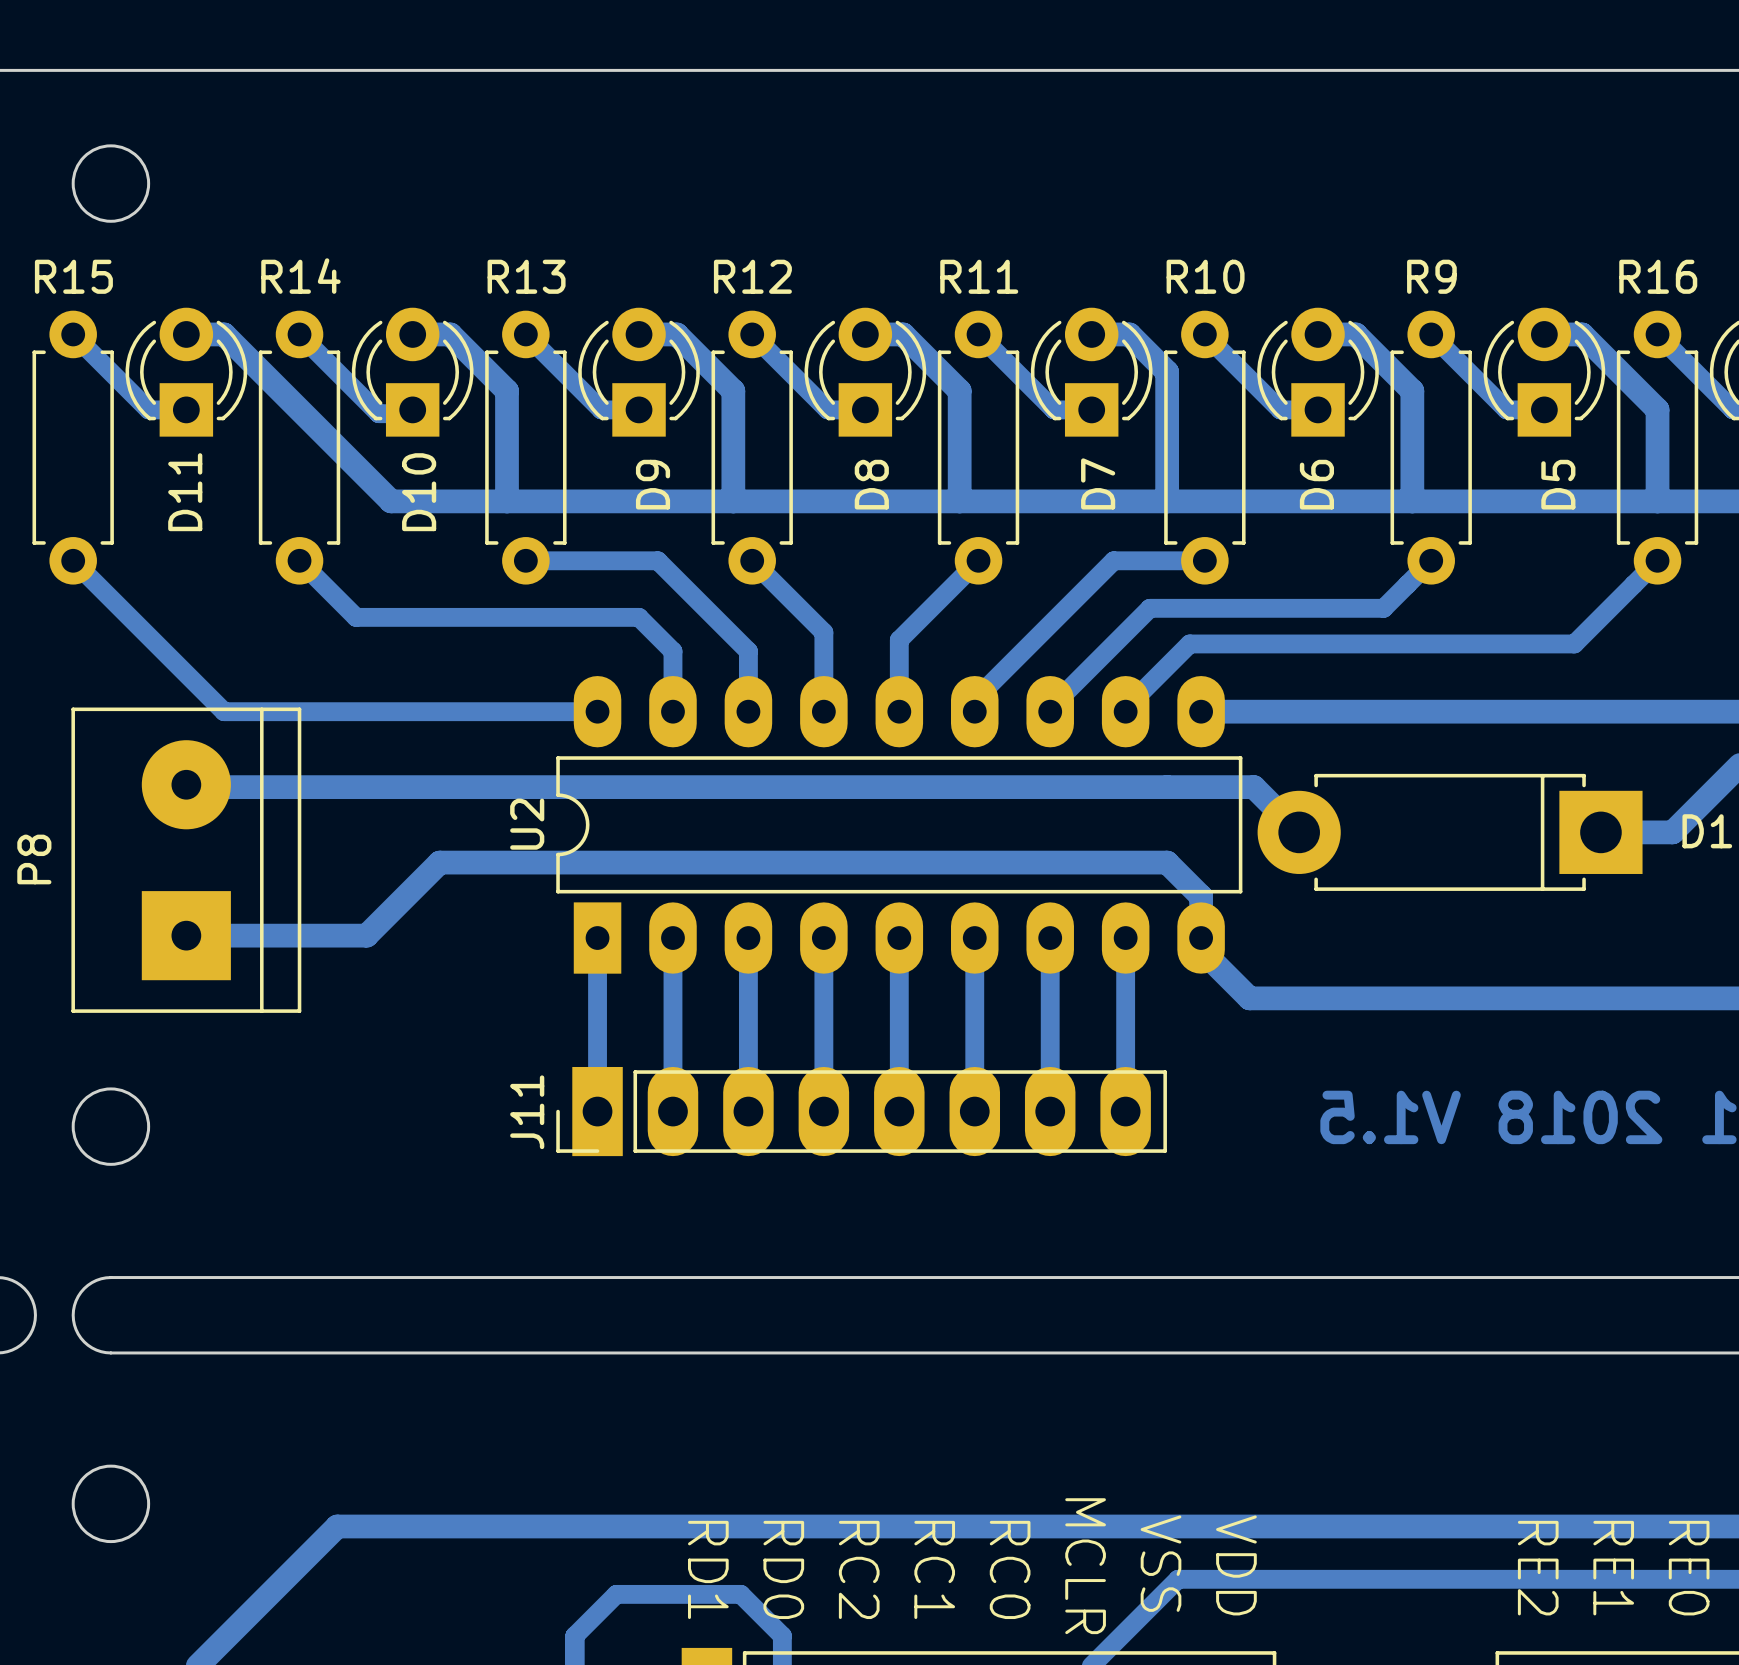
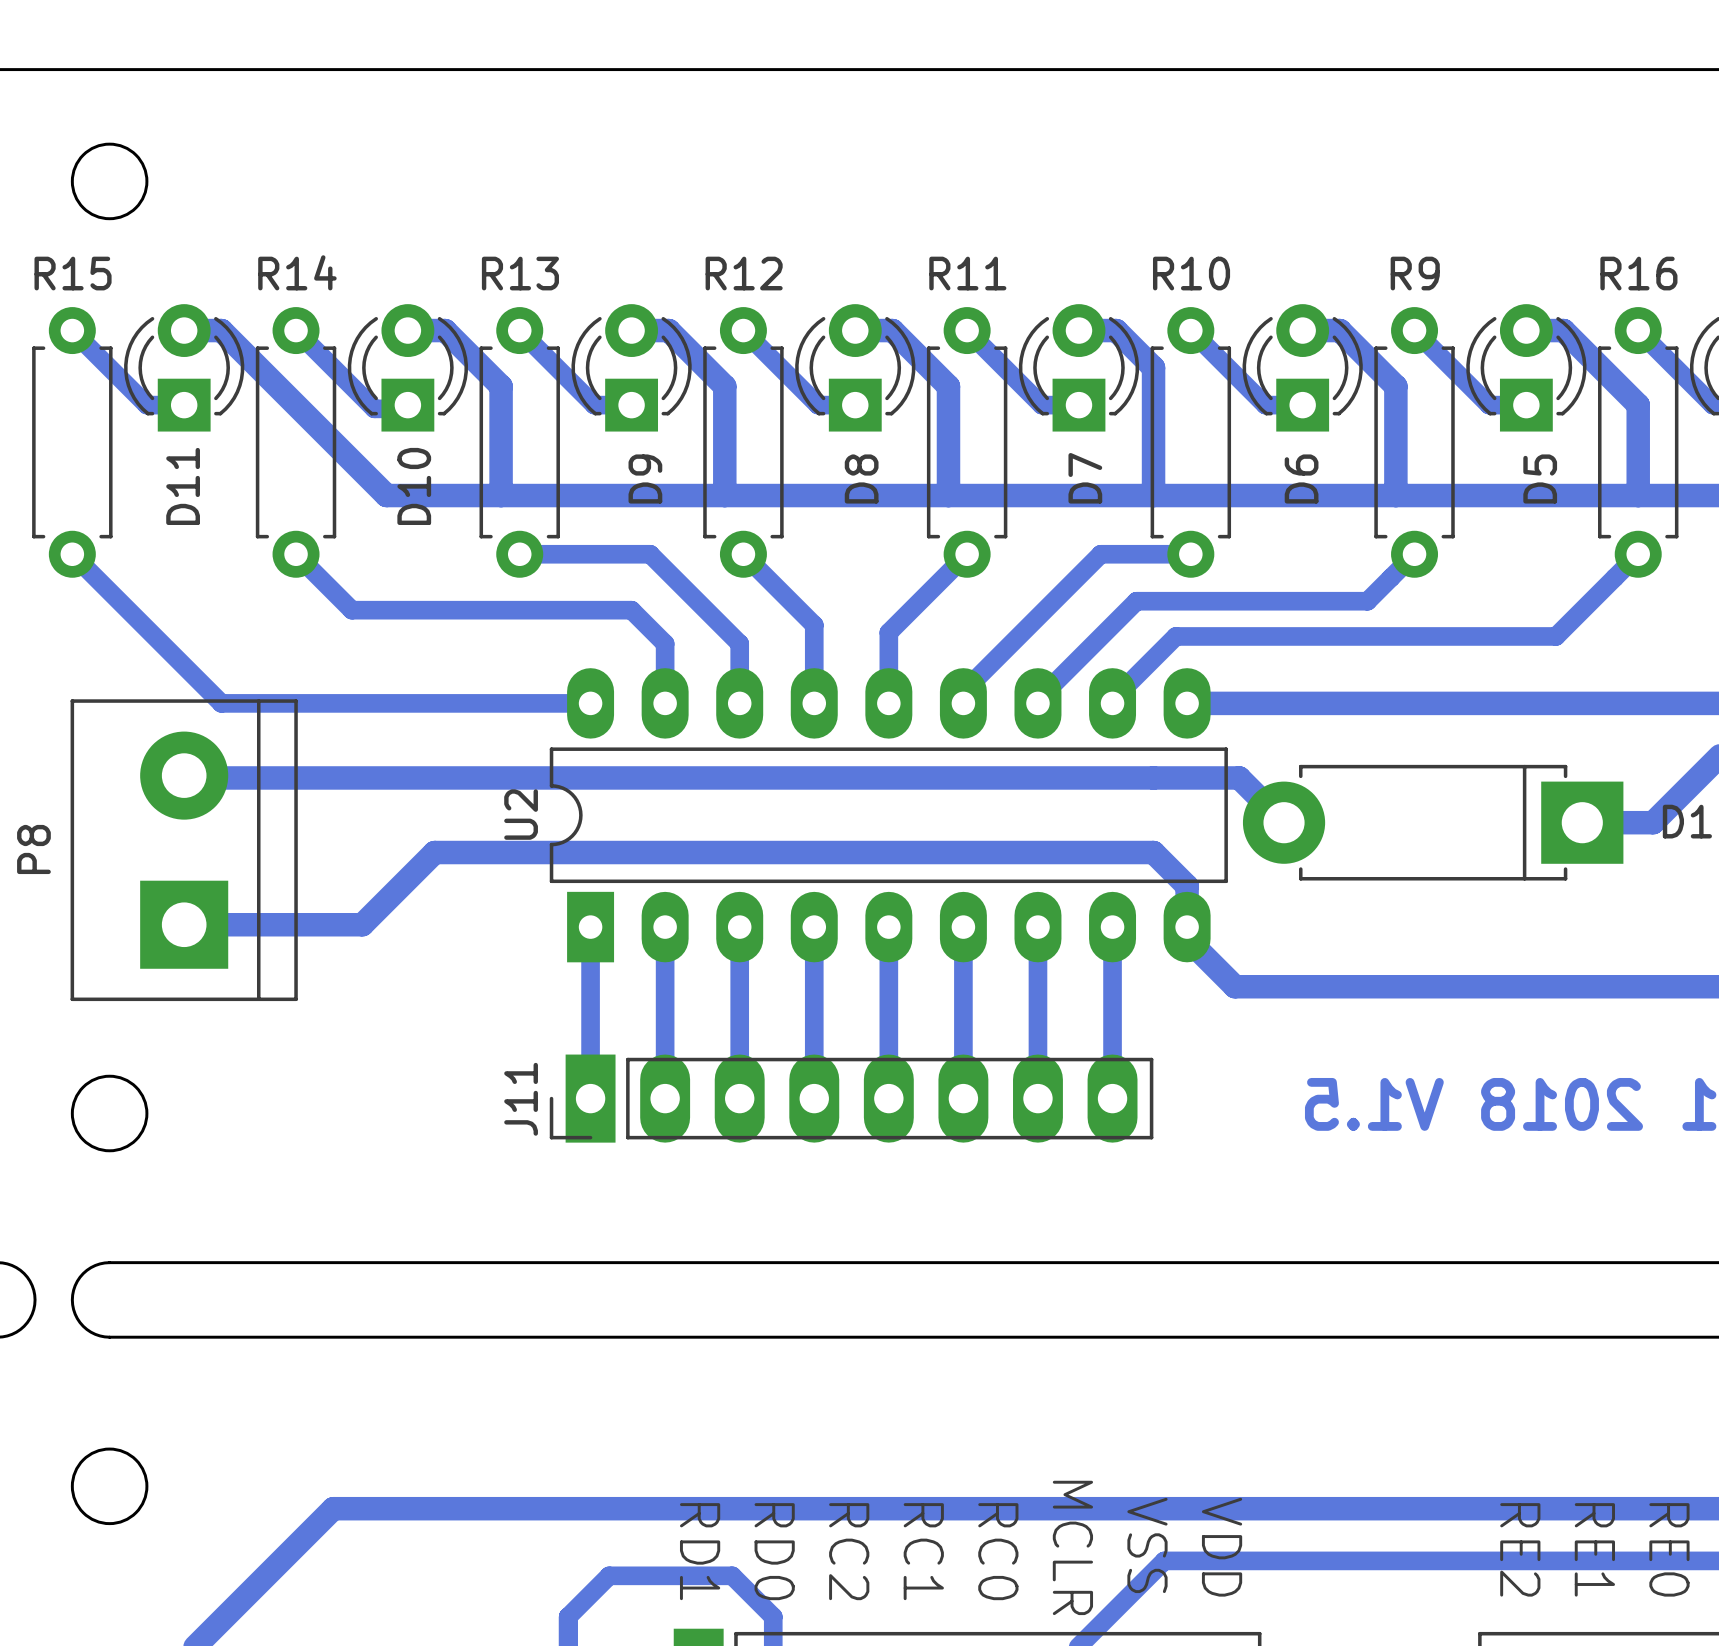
P8 footprint: [71, 707, 302, 1013] -> [70, 699, 298, 1002]

